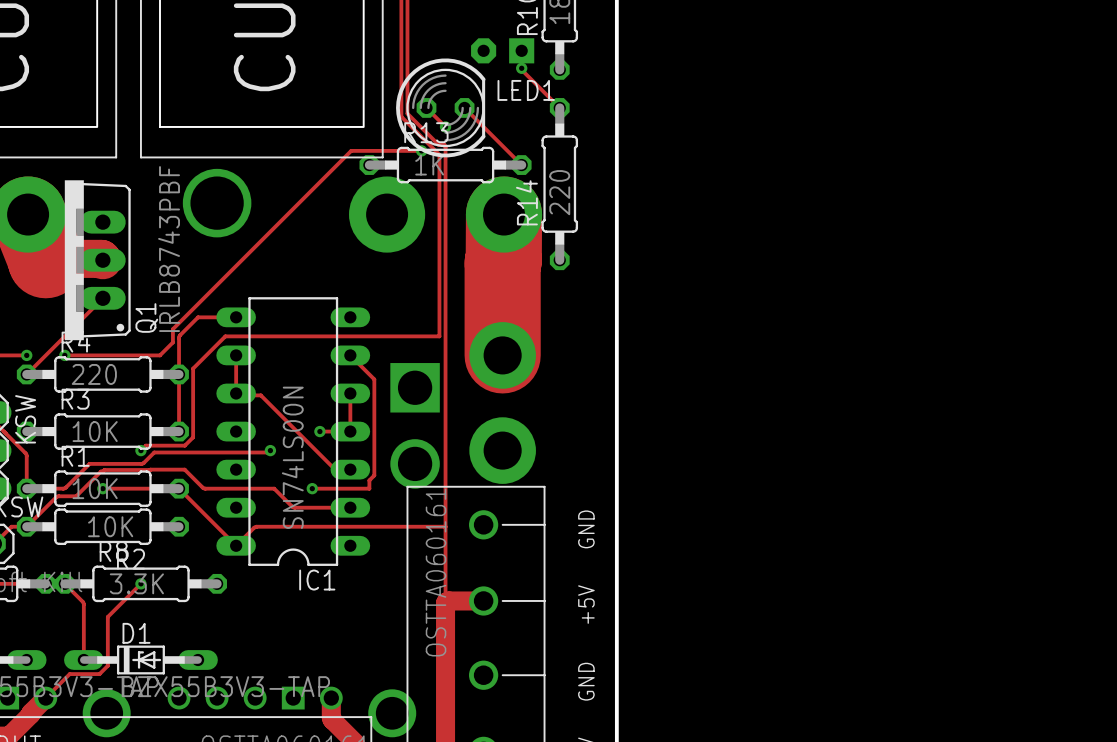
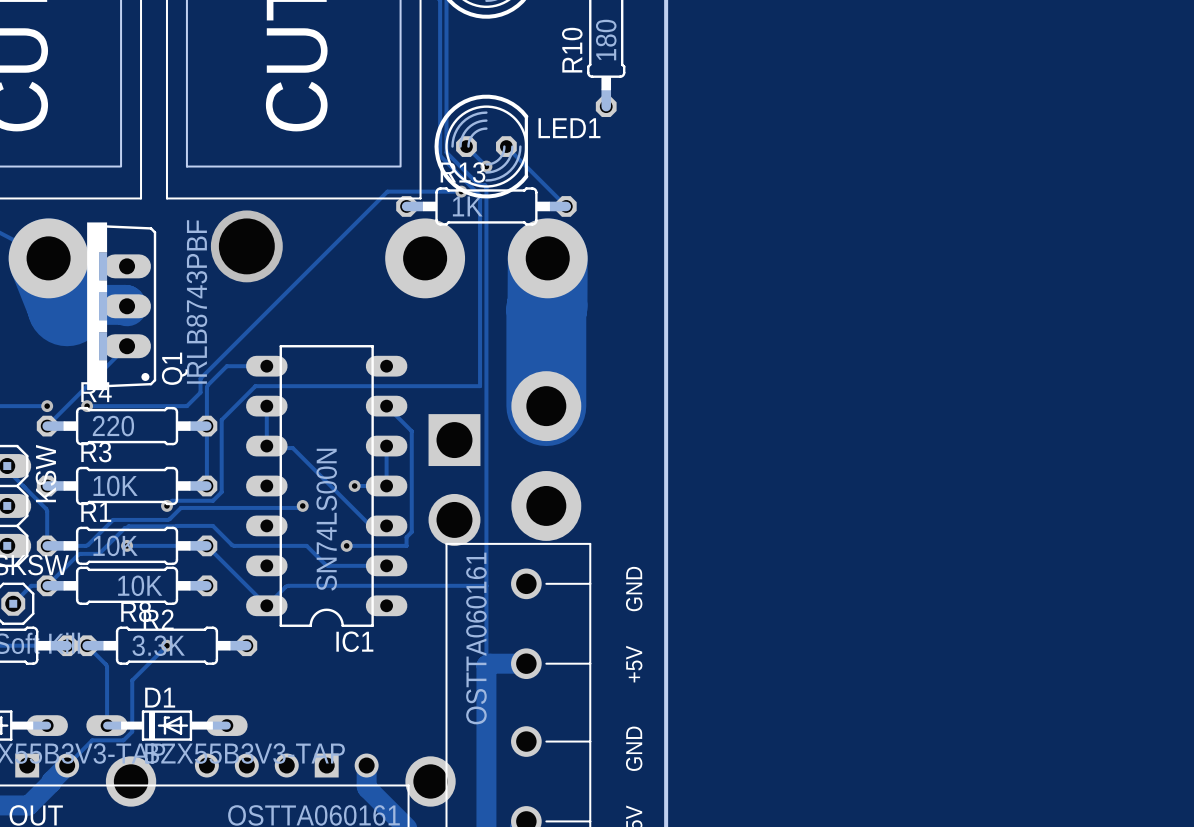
part: (502, 50) -> none
track: (521, 68) (559, 107) -> none
via: (521, 68) -> none
R14: 220 (559, 184) -> none

